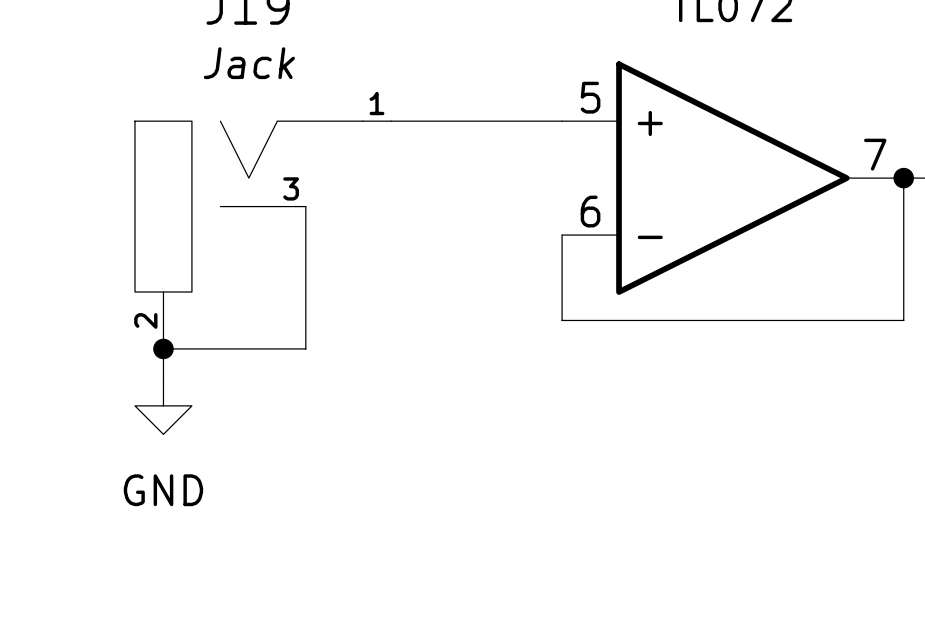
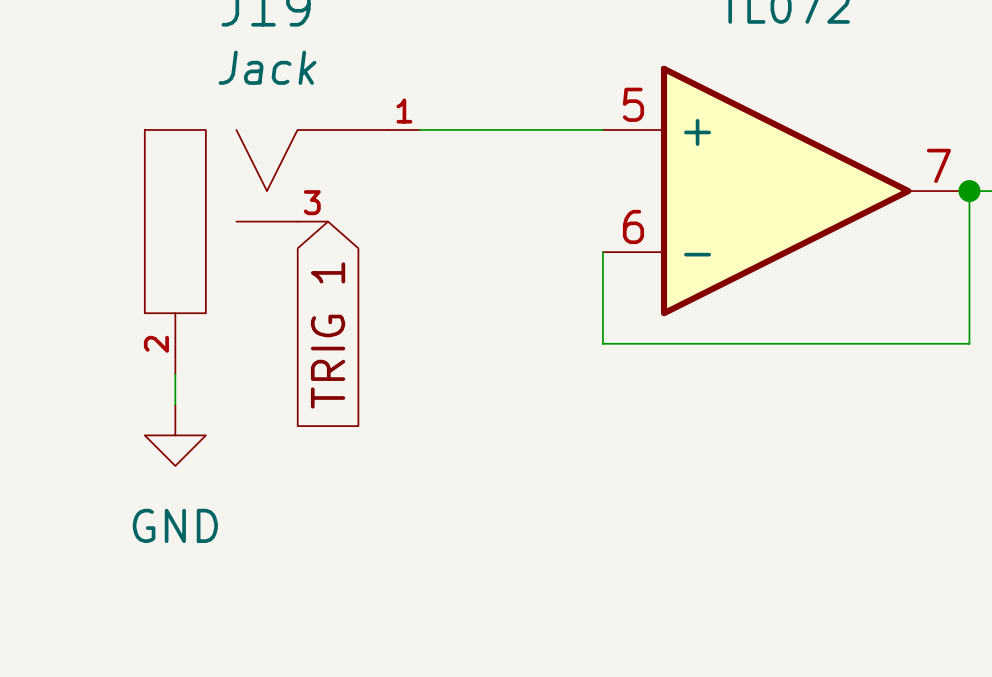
wire: (305, 206) (305, 348) (163, 348) -> none
global label: none -> TRIG 1 (328, 335)
junction: (163, 348) -> none

